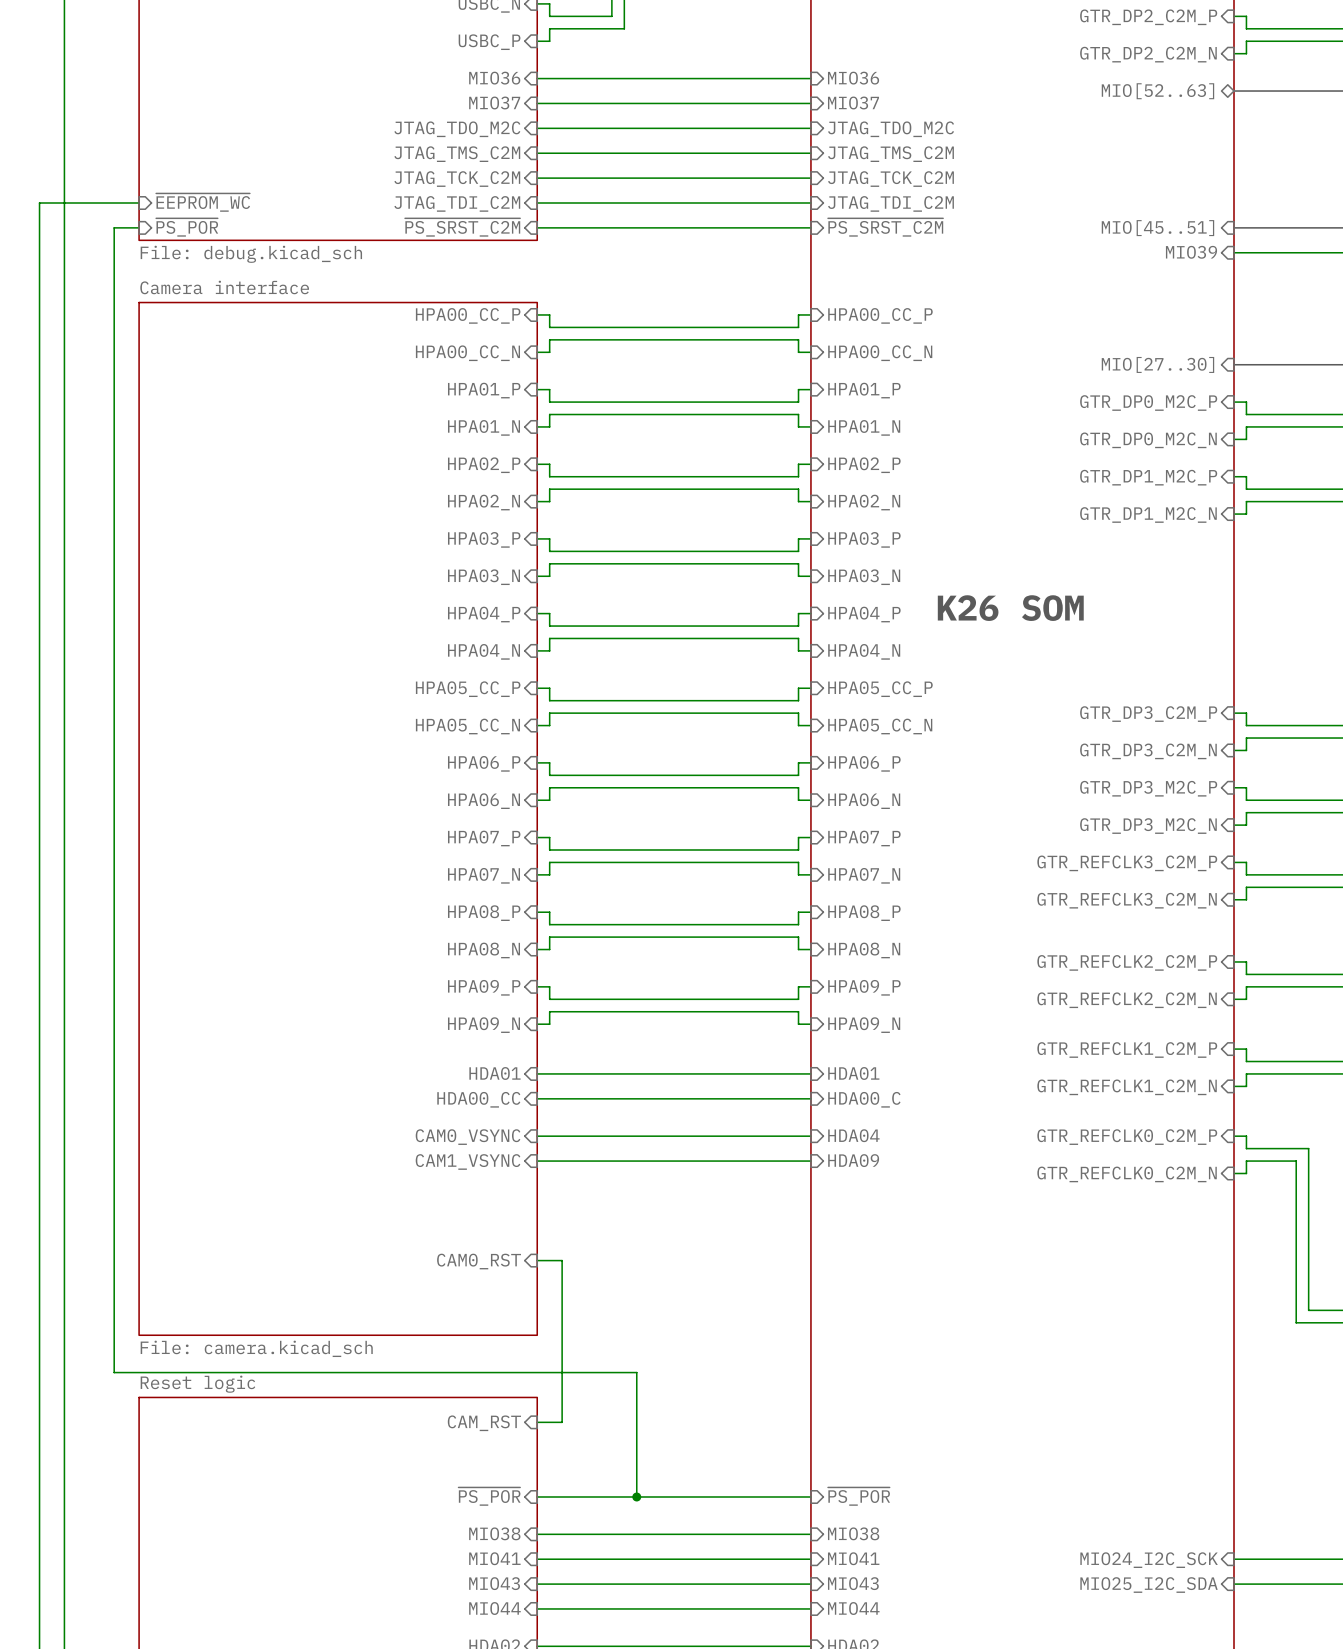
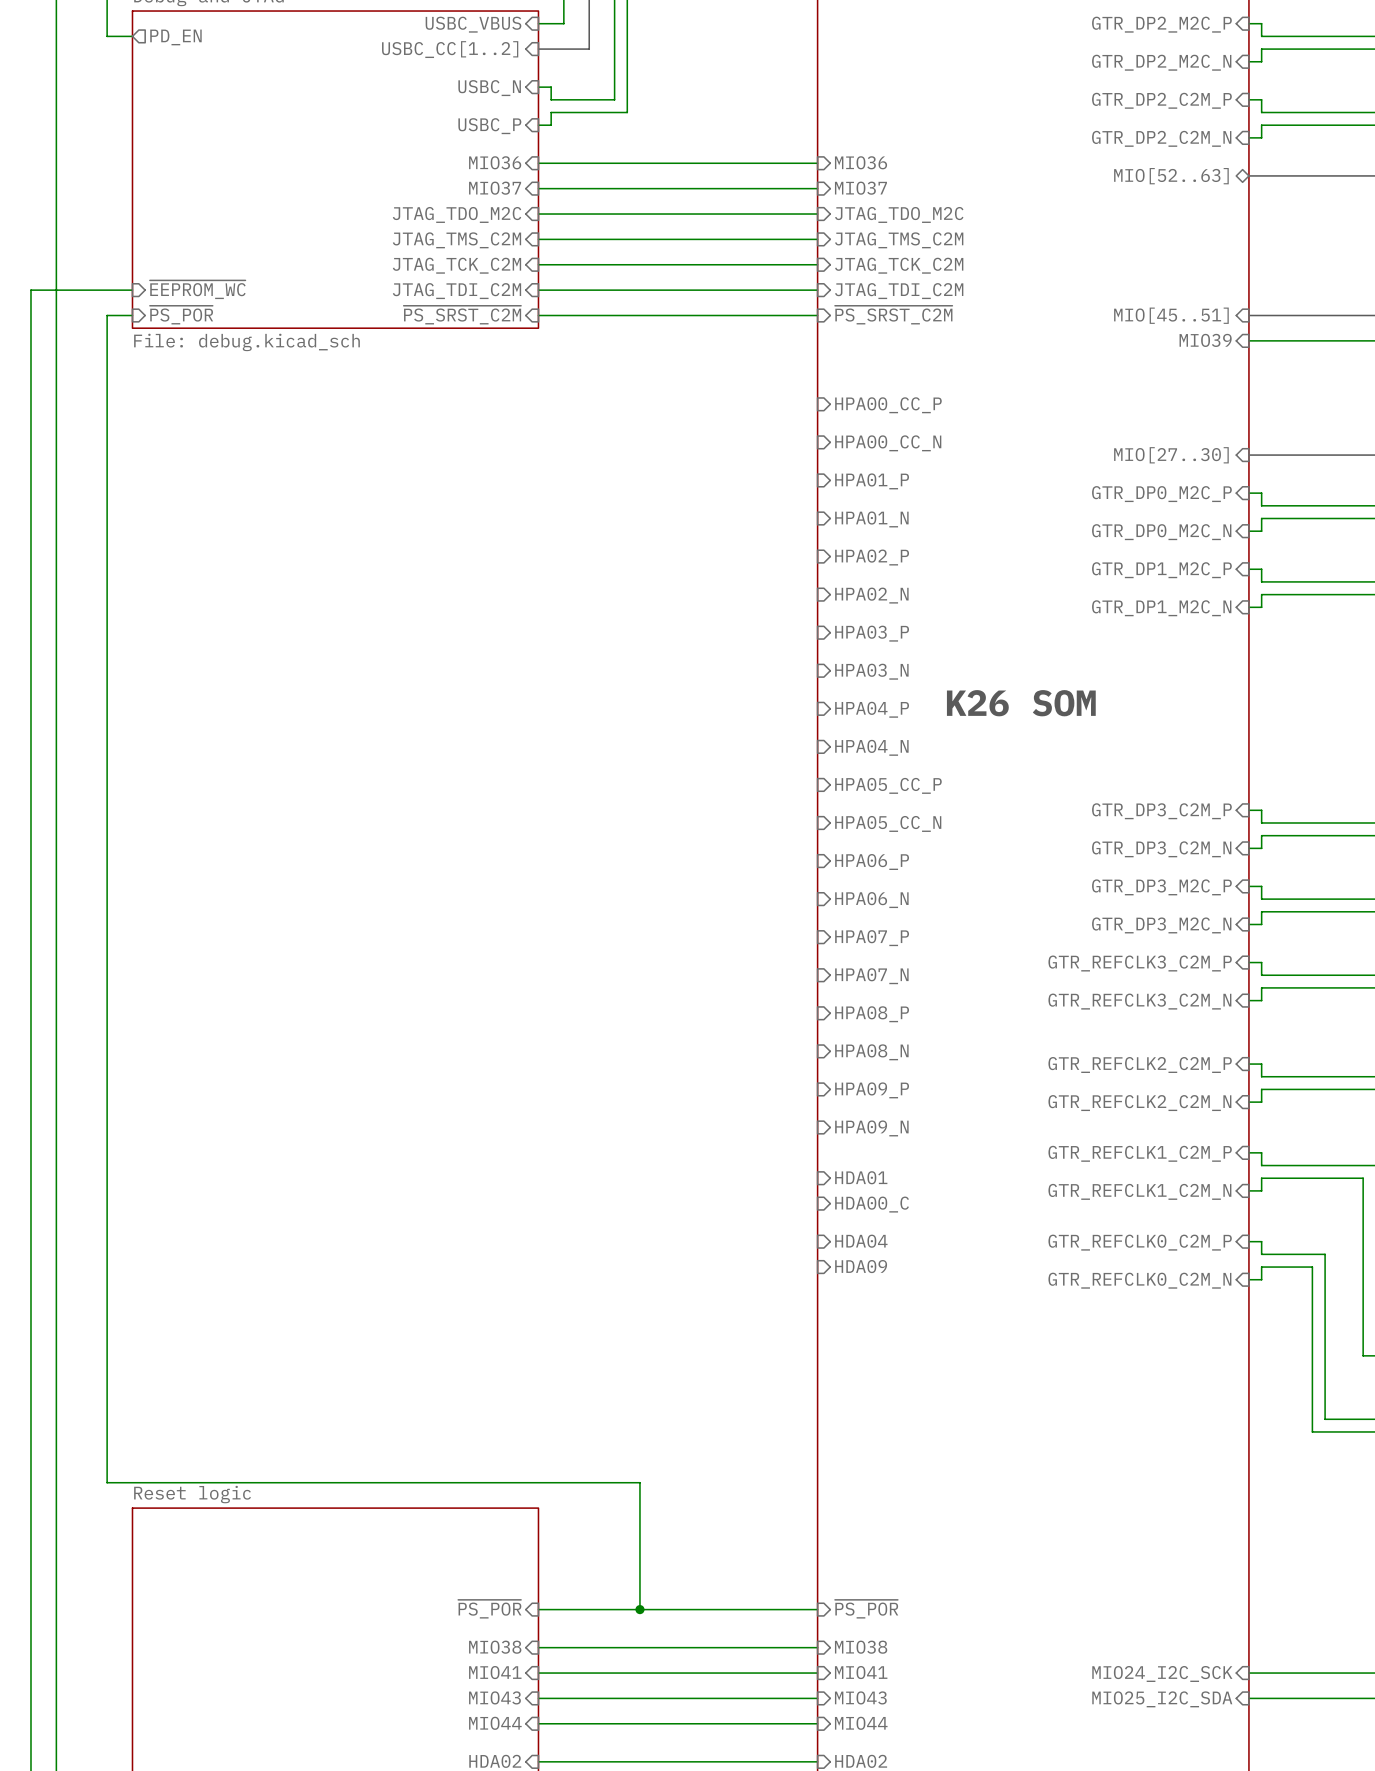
wire: (537, 314) (549, 314) (549, 327) (798, 327) (798, 314) (810, 314) -> none
sheet pin: HPA00_CC_P (468, 315) -> none
wire: (537, 352) (549, 352) (549, 339) (798, 339) (798, 352) (810, 352) -> none
sheet pin: HPA00_CC_N (467, 353) -> none
wire: (537, 389) (549, 389) (549, 402) (798, 402) (798, 389) (810, 389) -> none
sheet pin: HPA01_P (484, 390) -> none
wire: (537, 426) (549, 426) (549, 414) (798, 414) (798, 426) (810, 426) -> none
sheet pin: HPA01_N (483, 427) -> none
wire: (537, 464) (549, 464) (549, 476) (798, 476) (798, 464) (810, 464) -> none
sheet pin: HPA02_P (484, 465) -> none
wire: (537, 501) (549, 501) (549, 489) (798, 489) (798, 501) (810, 501) -> none
sheet pin: HPA02_N (483, 502) -> none
wire: (537, 538) (549, 538) (549, 551) (798, 551) (798, 538) (810, 538) -> none
sheet pin: HPA03_P (484, 539) -> none
wire: (537, 576) (549, 576) (549, 563) (798, 563) (798, 576) (810, 576) -> none
sheet pin: HPA03_N (483, 577) -> none
wire: (537, 613) (549, 613) (549, 626) (798, 626) (798, 613) (810, 613) -> none
sheet pin: HPA04_P (484, 614) -> none
wire: (537, 650) (549, 650) (549, 638) (798, 638) (798, 650) (810, 650) -> none
sheet pin: HPA04_N (483, 651) -> none
wire: (537, 688) (549, 688) (549, 700) (798, 700) (798, 688) (810, 688) -> none
sheet pin: HPA05_CC_P (468, 689) -> none
wire: (537, 725) (549, 725) (549, 713) (798, 713) (798, 725) (810, 725) -> none
sheet pin: HPA05_CC_N (467, 726) -> none
wire: (537, 762) (549, 762) (549, 775) (798, 775) (798, 762) (810, 762) -> none
sheet pin: HPA06_P (484, 763) -> none
wire: (537, 800) (549, 800) (549, 787) (798, 787) (798, 800) (810, 800) -> none
sheet pin: HPA06_N (483, 801) -> none
sheet Camera interface: File: camera.kicad_sch (338, 818) -> none
wire: (537, 837) (549, 837) (549, 849) (798, 849) (798, 837) (810, 837) -> none
sheet pin: HPA07_P (484, 838) -> none
wire: (537, 874) (549, 874) (549, 862) (798, 862) (798, 874) (810, 874) -> none
sheet pin: HPA07_N (483, 875) -> none
wire: (537, 912) (549, 912) (549, 924) (798, 924) (798, 912) (810, 912) -> none
sheet pin: HPA08_P (484, 913) -> none
wire: (537, 949) (549, 949) (549, 937) (798, 937) (798, 949) (810, 949) -> none
sheet pin: HPA08_N (483, 950) -> none
wire: (537, 986) (549, 986) (549, 999) (798, 999) (798, 986) (810, 986) -> none
sheet pin: HPA09_P (484, 987) -> none
wire: (537, 1024) (549, 1024) (549, 1011) (798, 1011) (798, 1024) (810, 1024) -> none
sheet pin: HPA09_N (483, 1025) -> none
sheet pin: HDA01 (494, 1073) -> none
wire: (537, 1073) (810, 1073) -> none
wire: (537, 1098) (810, 1098) -> none
sheet pin: HDA00_CC (478, 1099) -> none
wire: (537, 1136) (810, 1136) -> none
sheet pin: CAM0_VSYNC (468, 1137) -> none
sheet pin: CAM1_VSYNC (468, 1161) -> none
wire: (537, 1161) (810, 1161) -> none
wire: (537, 1260) (562, 1260) (562, 1422) (537, 1422) -> none
sheet pin: CAM0_RST (479, 1261) -> none
sheet pin: CAM_RST (484, 1423) -> none

